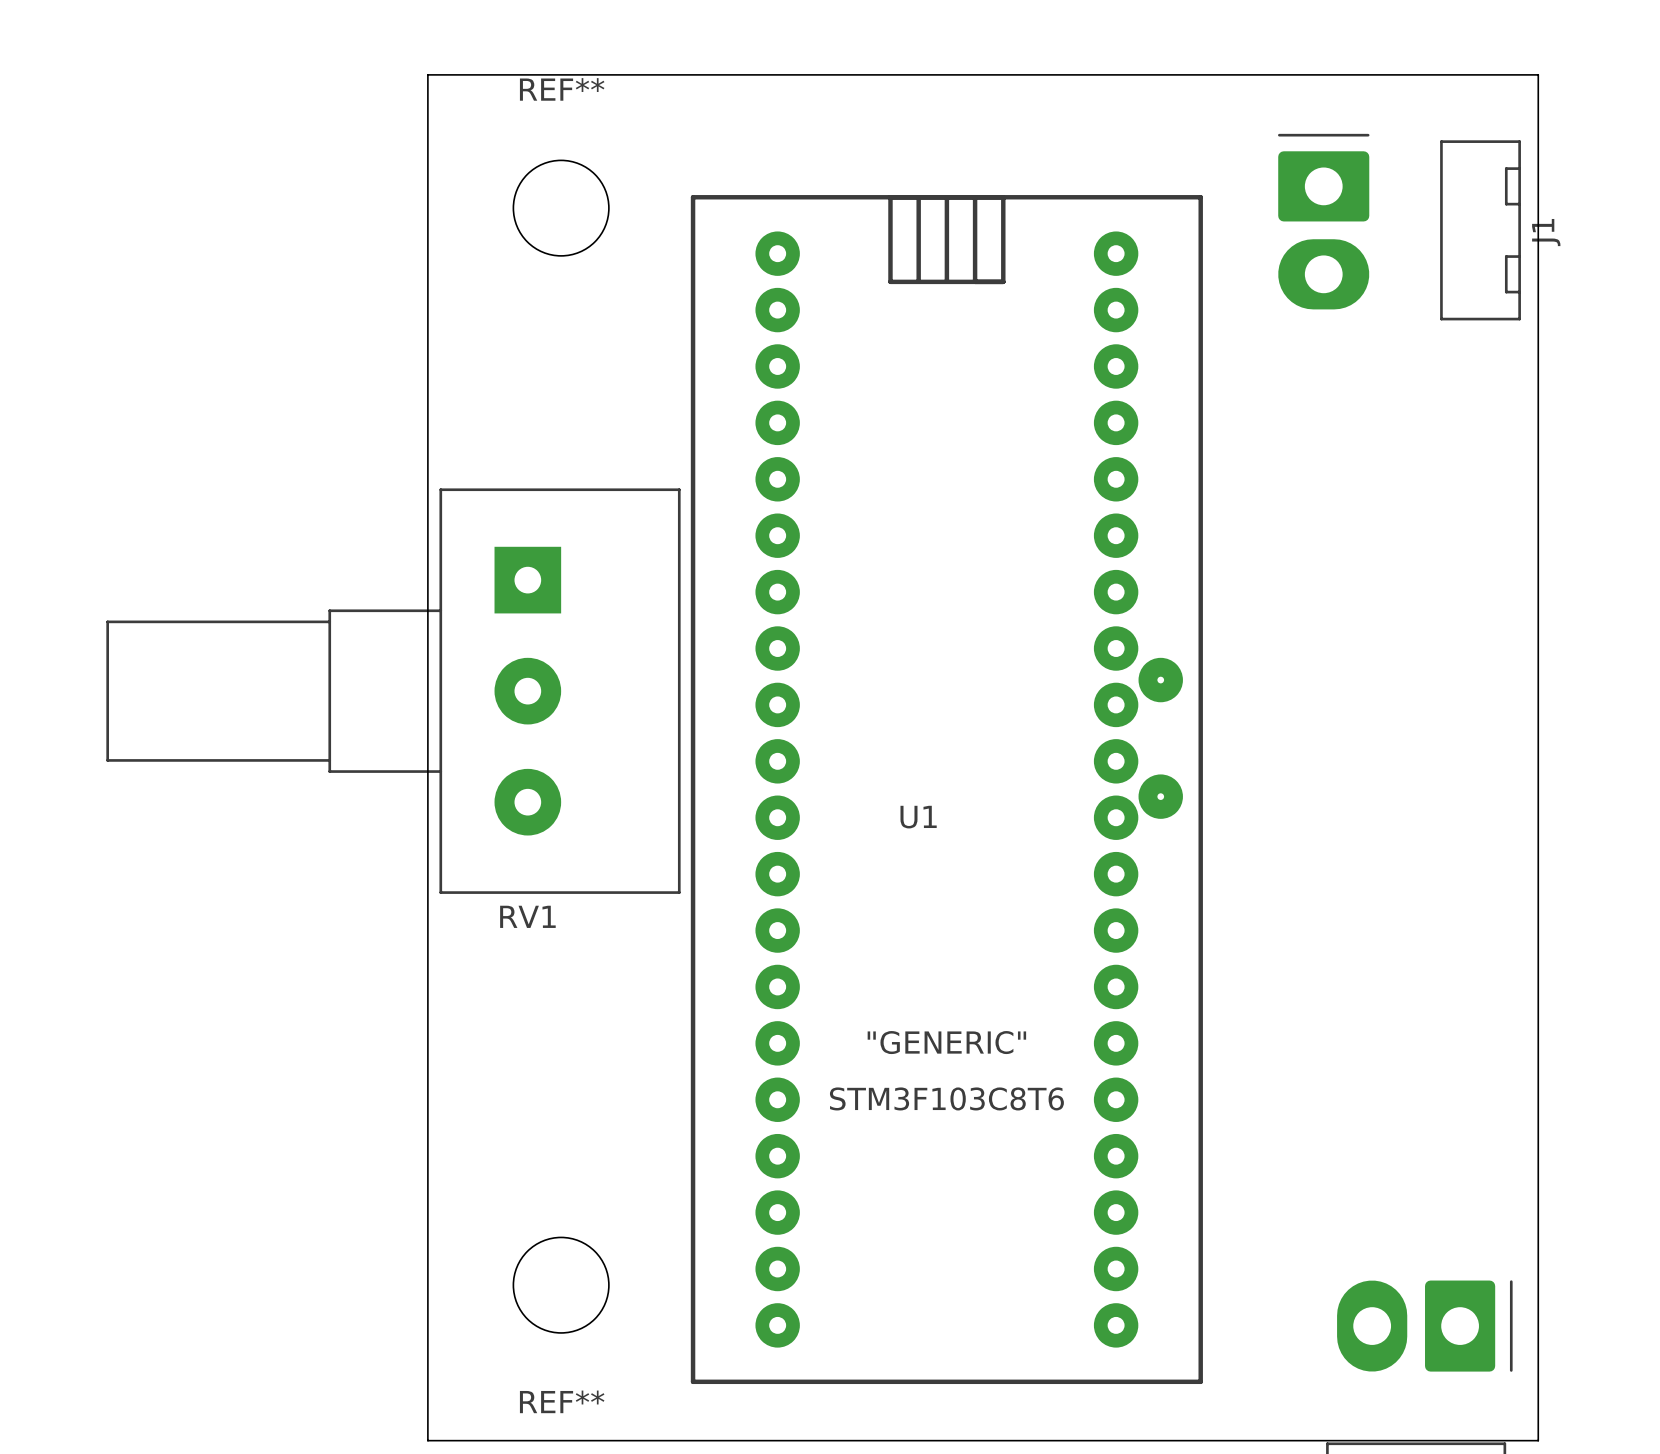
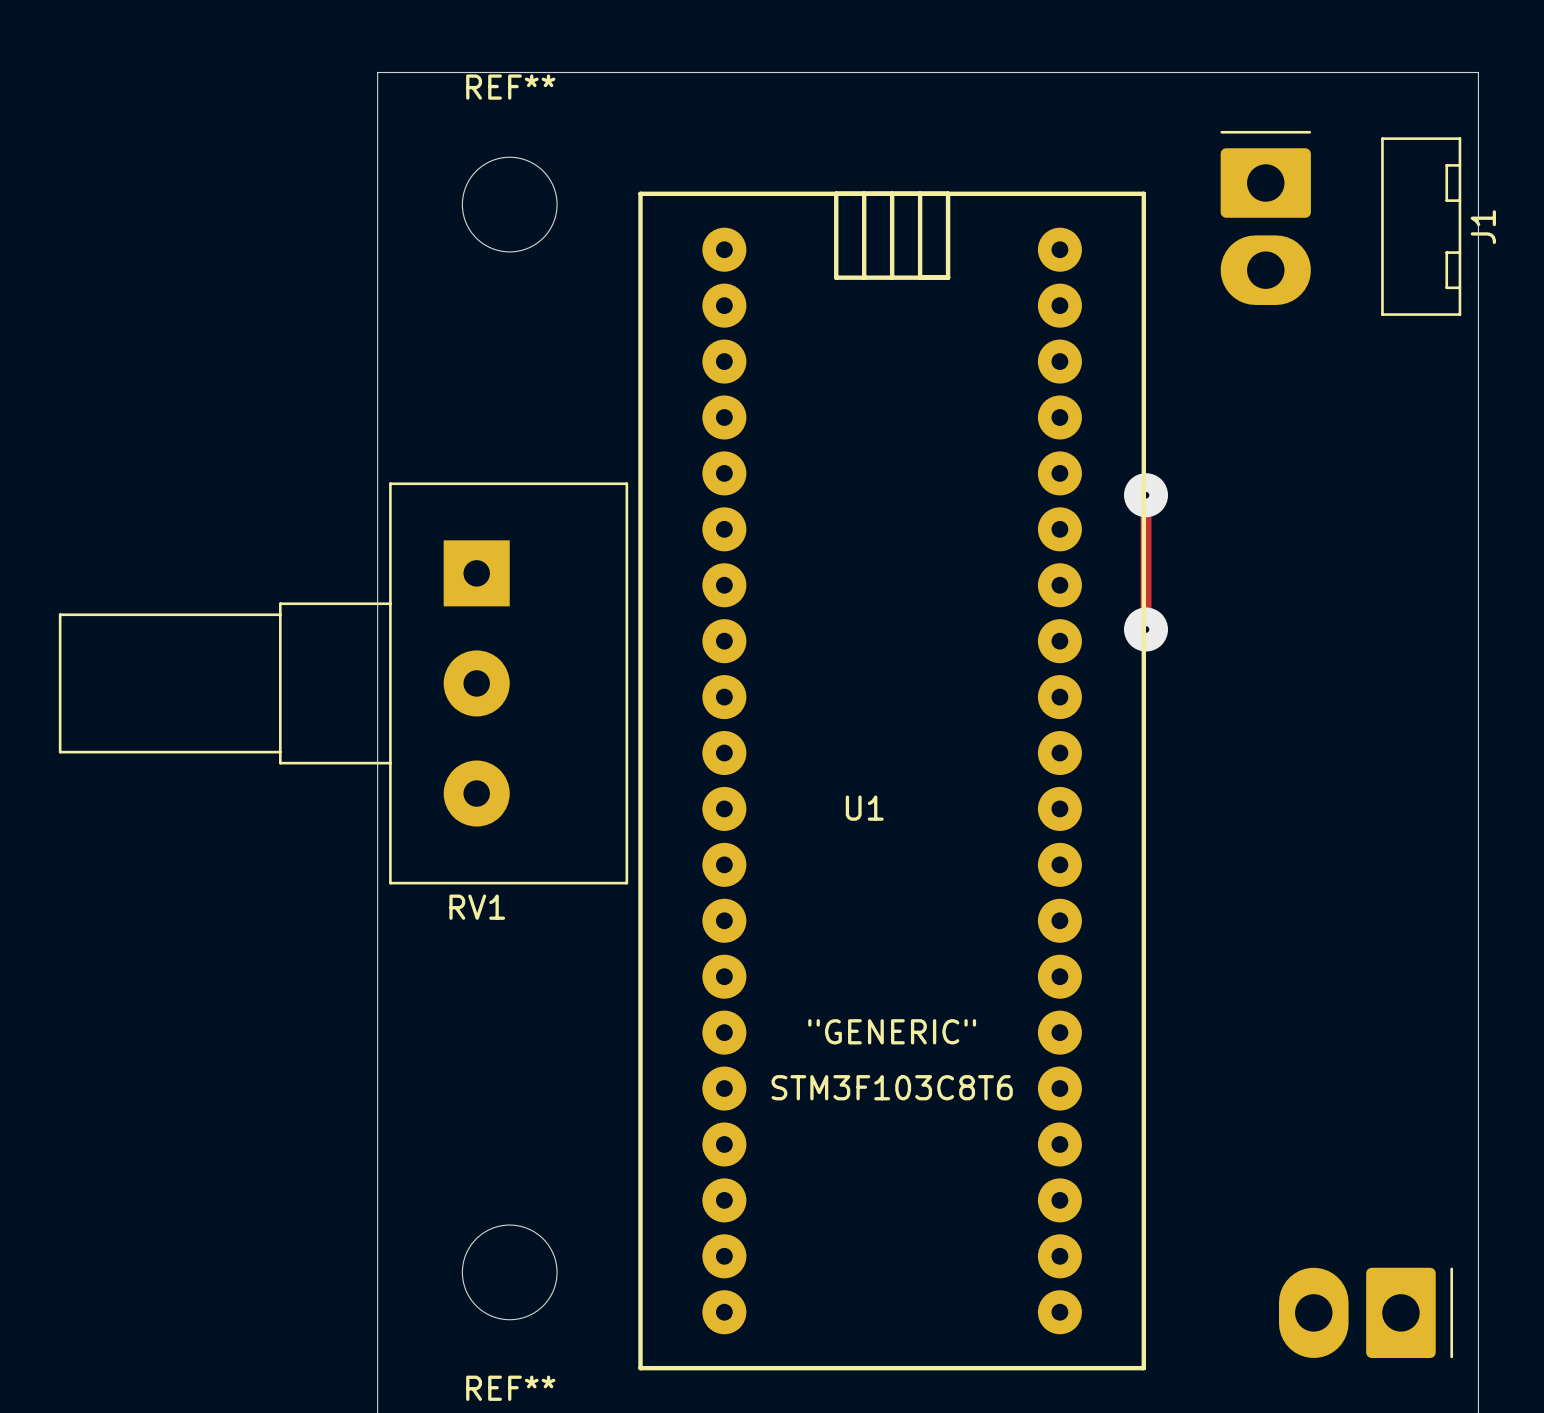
track: none -> (1146, 495) (1146, 629)
via: none -> (1146, 495)
via position: (1160, 680) -> (1146, 629)
via: (1160, 796) -> none

